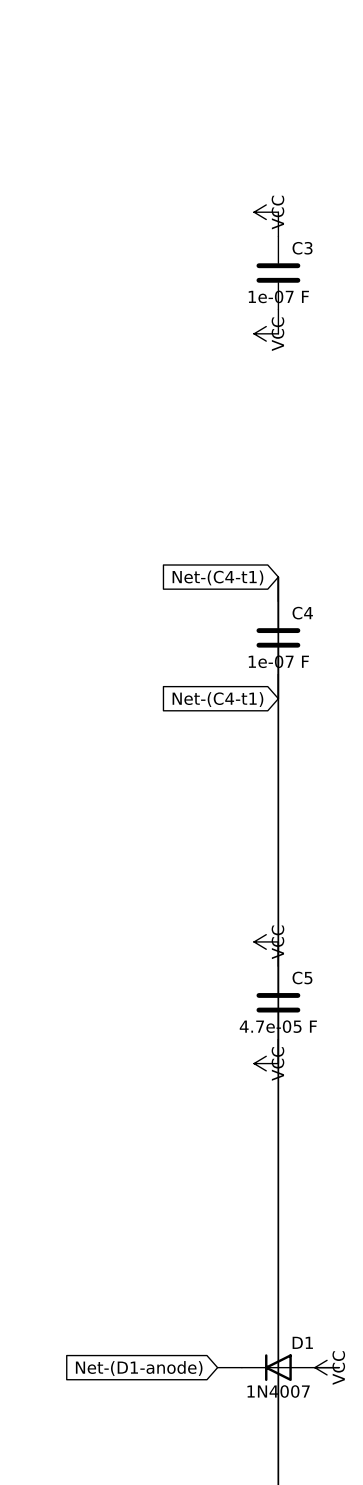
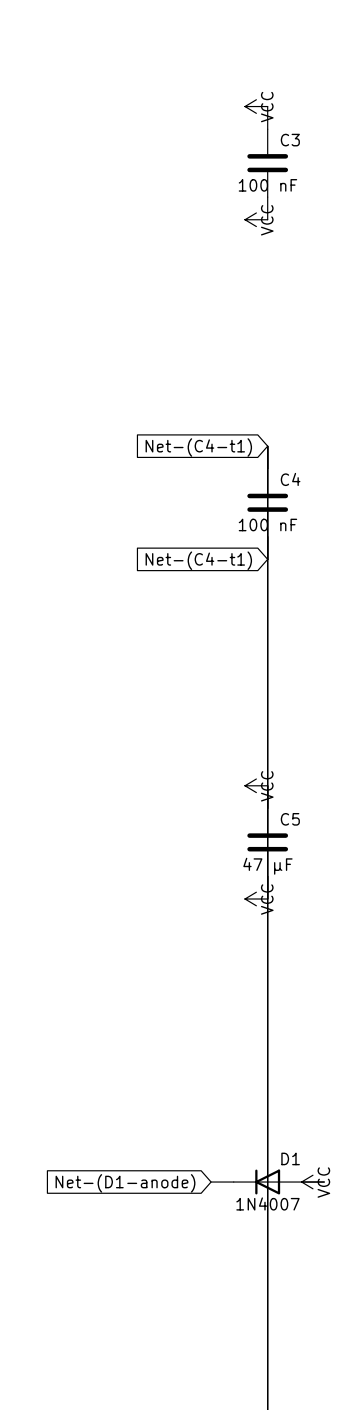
C3 value: 1e-07 F (278, 296) -> 100 nF (267, 185)
C4 value: 1e-07 F (278, 661) -> 100 nF (267, 524)
C5 value: 4.7e-05 F (278, 1026) -> 47 µF (267, 866)

